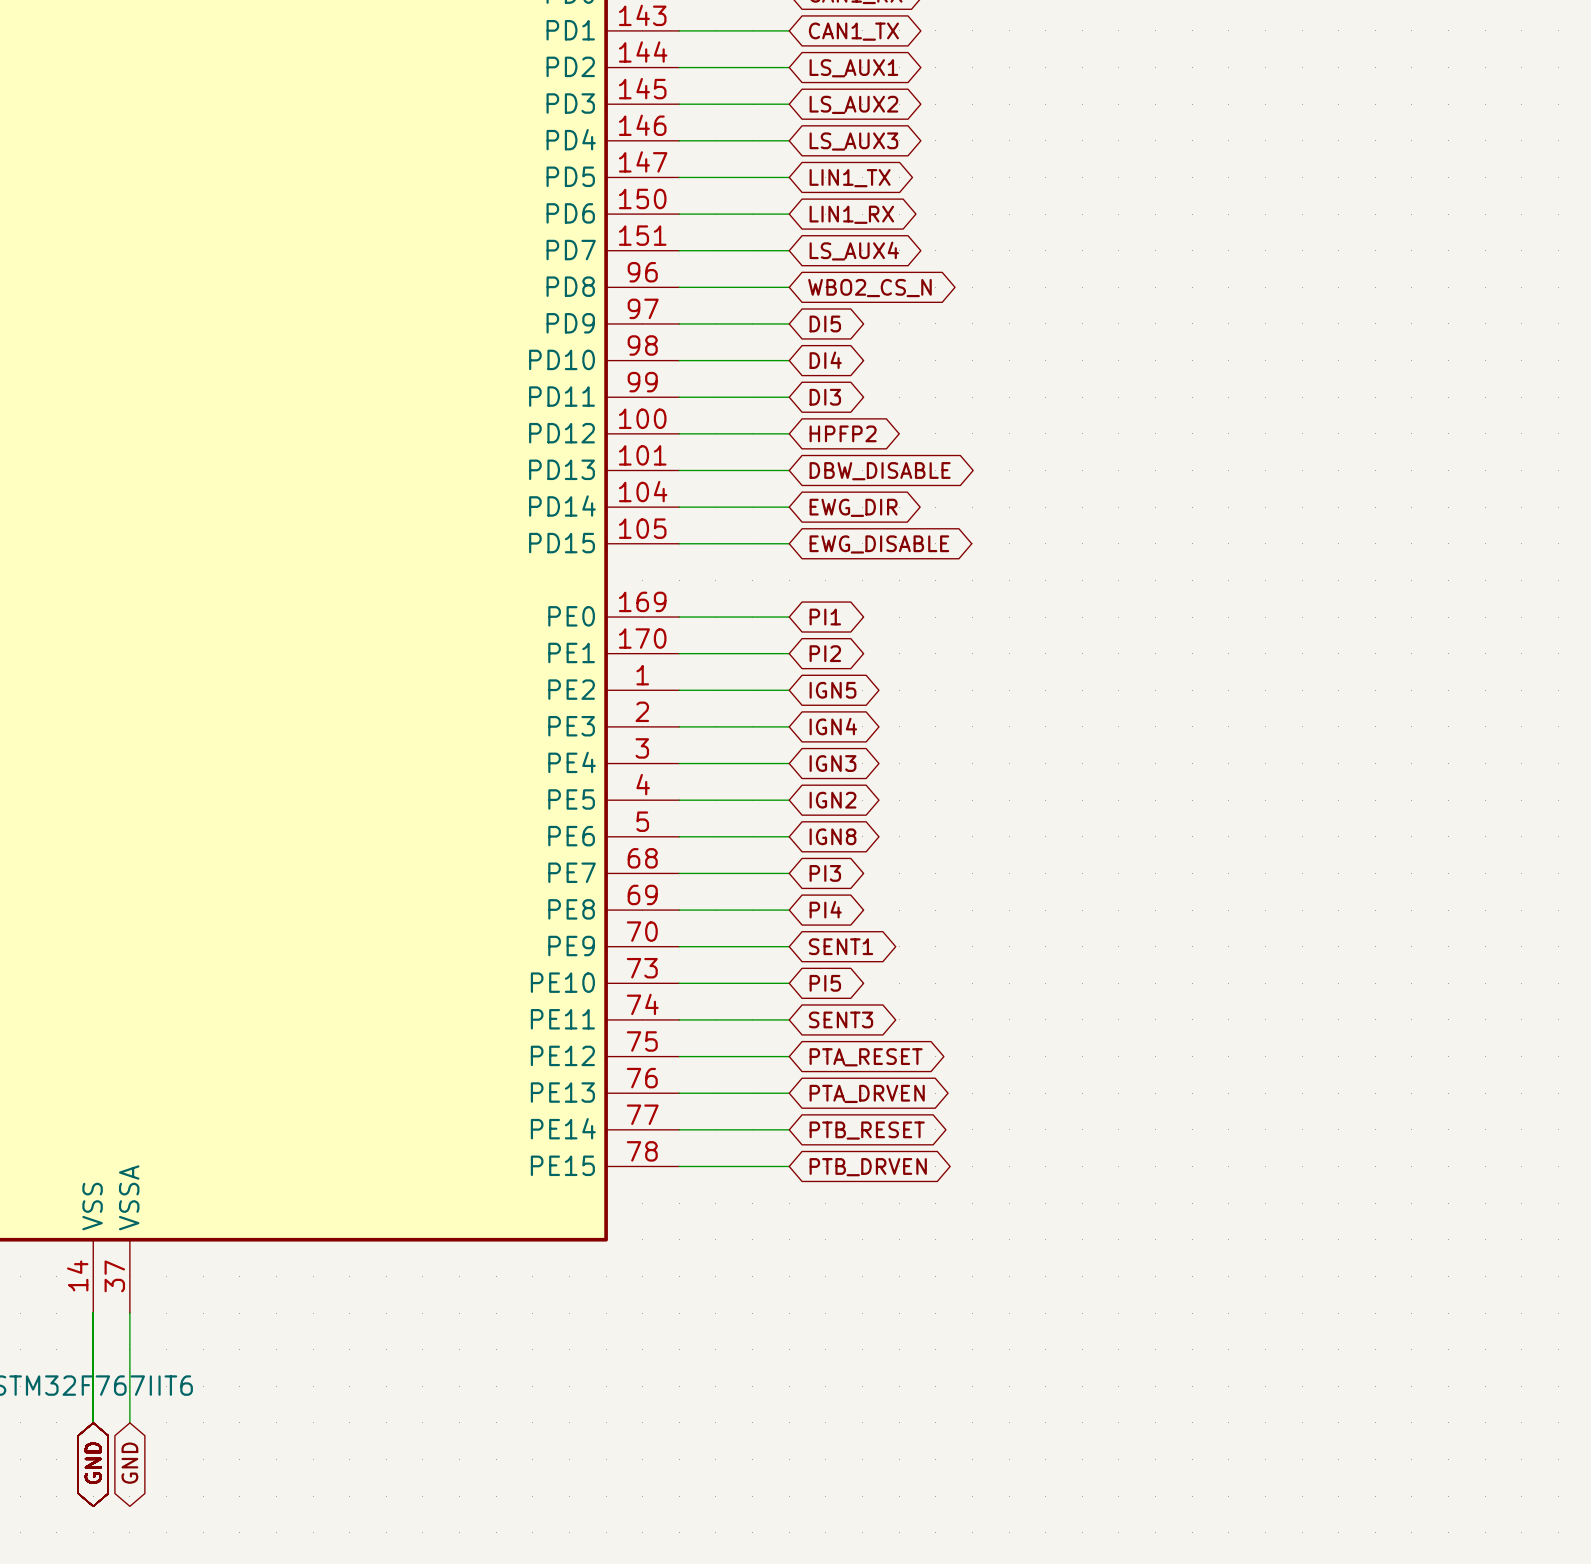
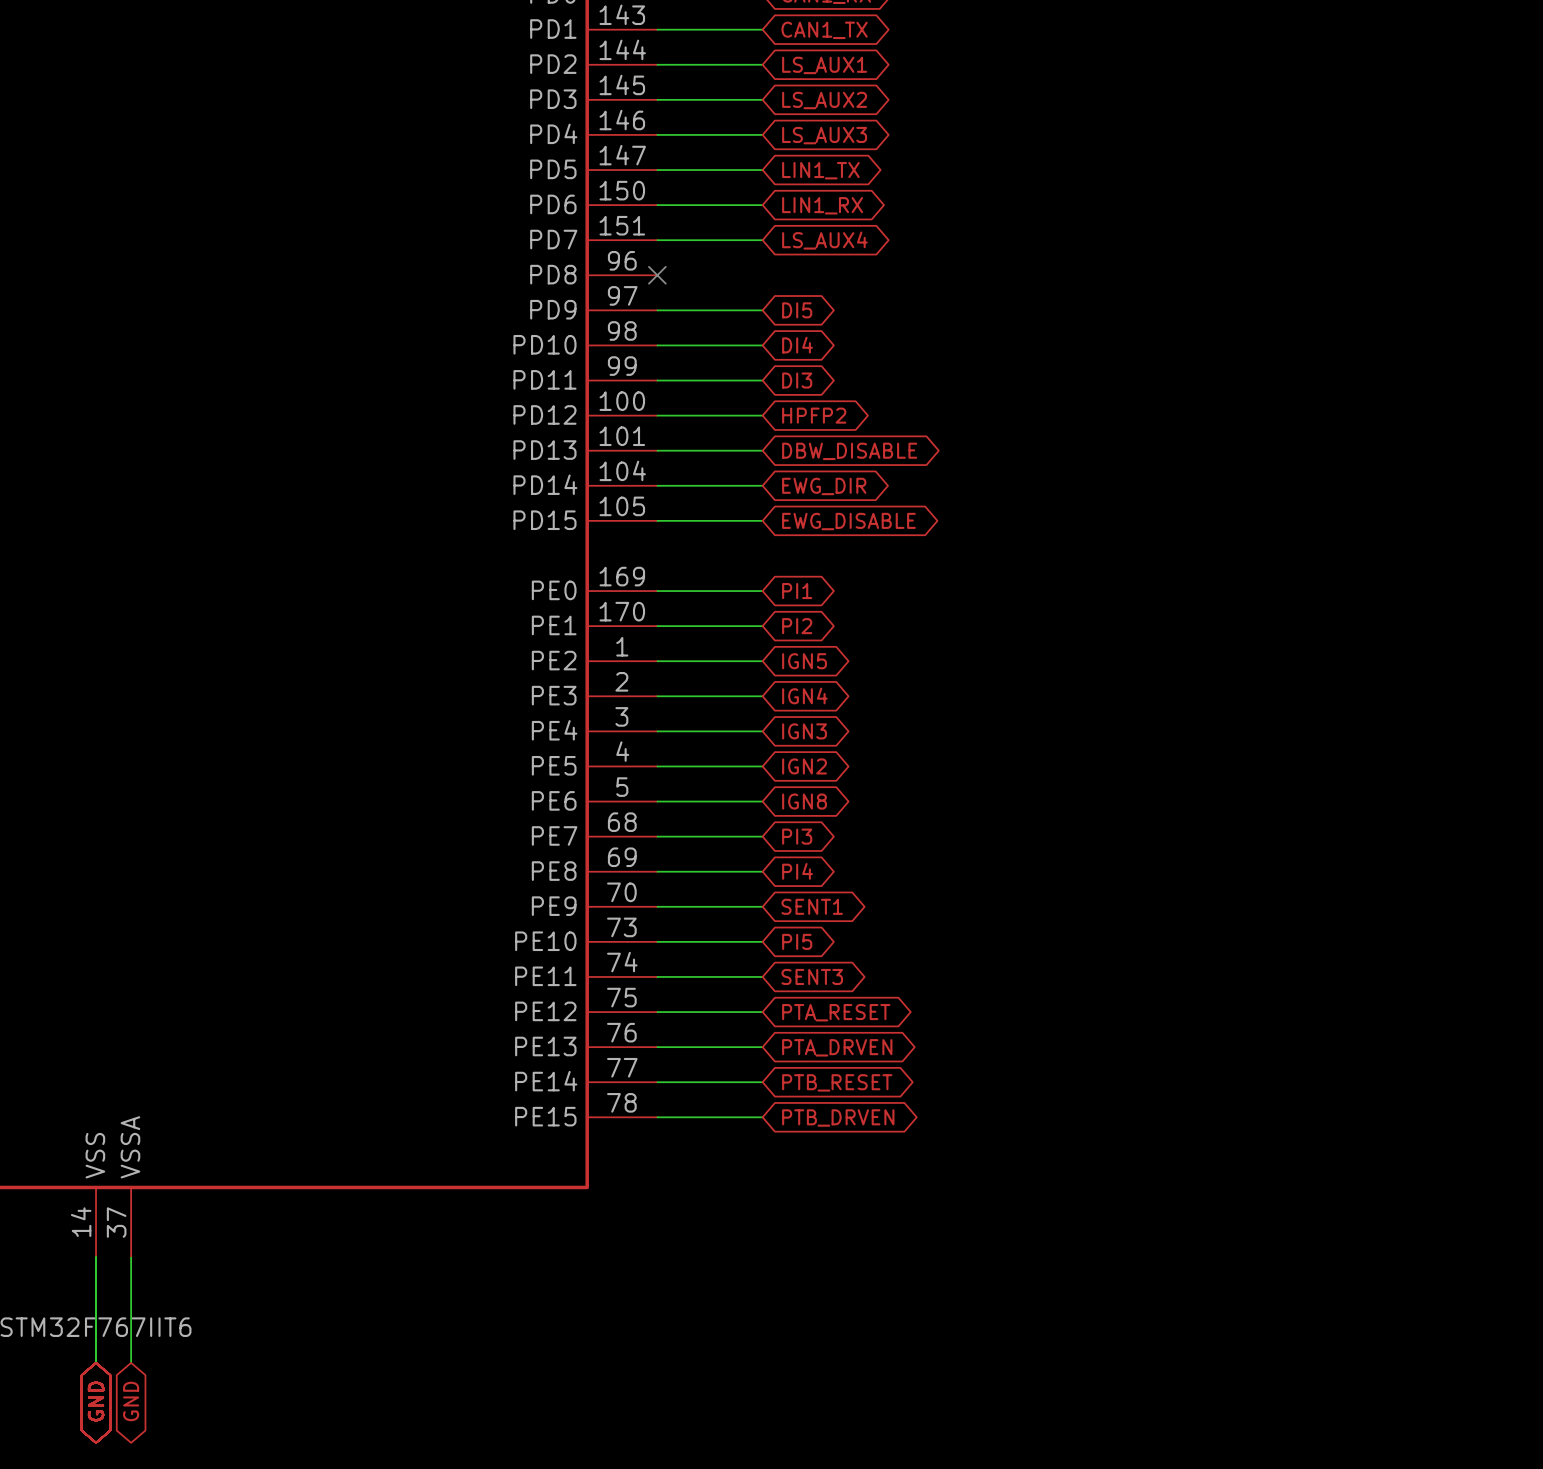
wire: (679, 287) (789, 287) -> none
no-connect mark: none -> (657, 275)
global label: WBO2_CS_N (869, 288) -> none

